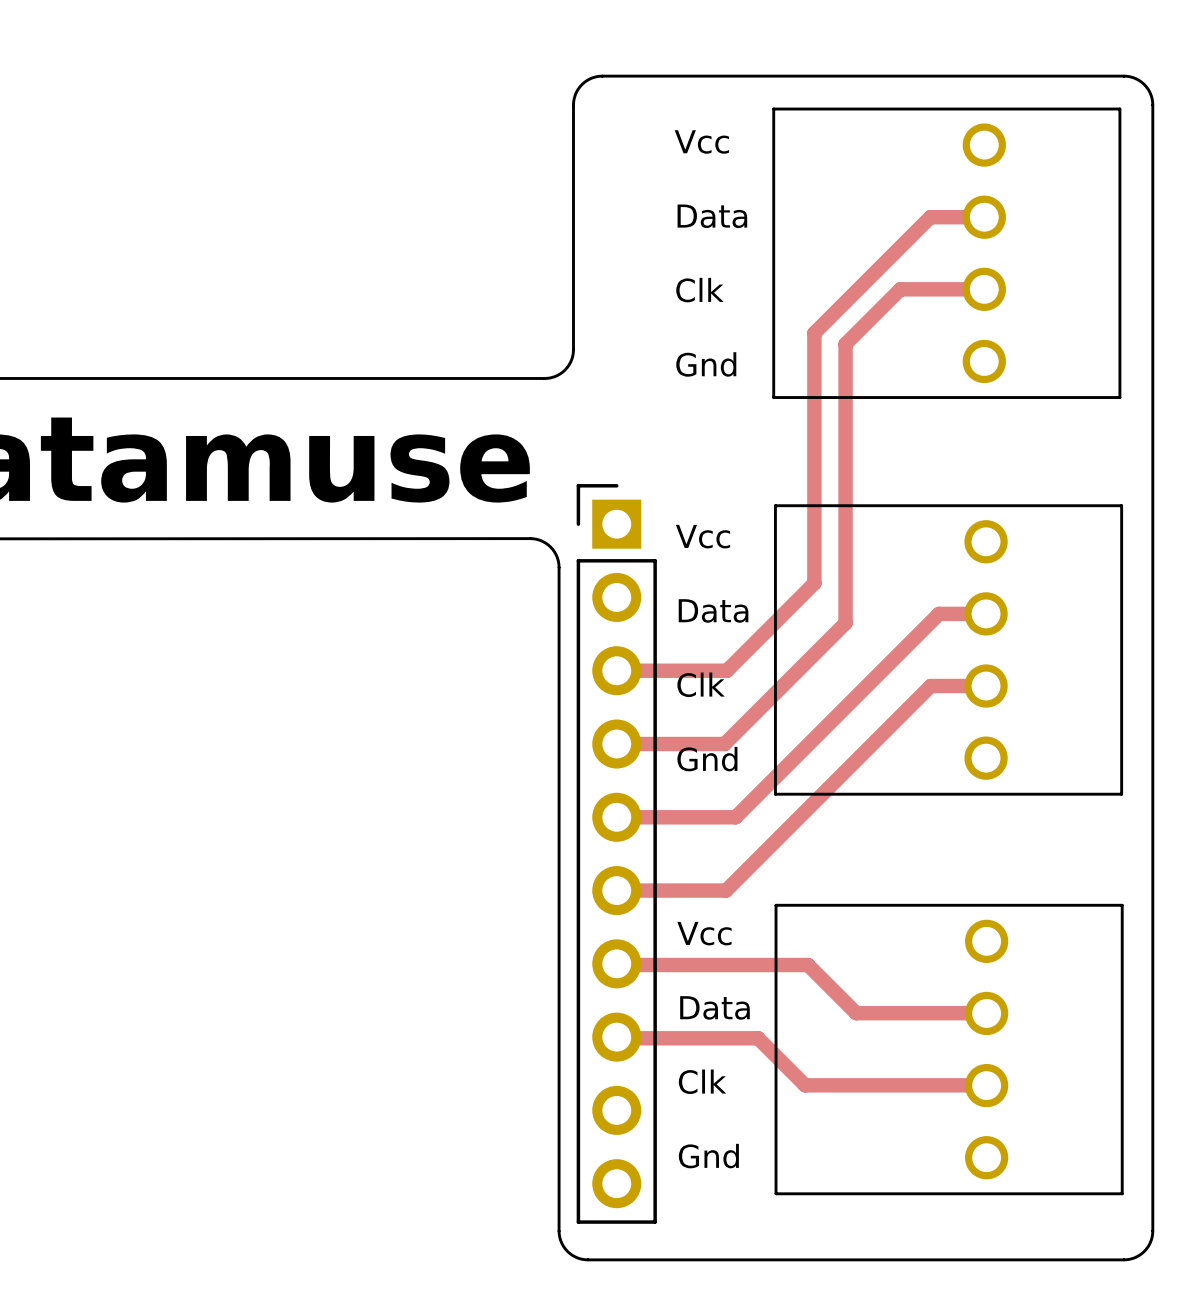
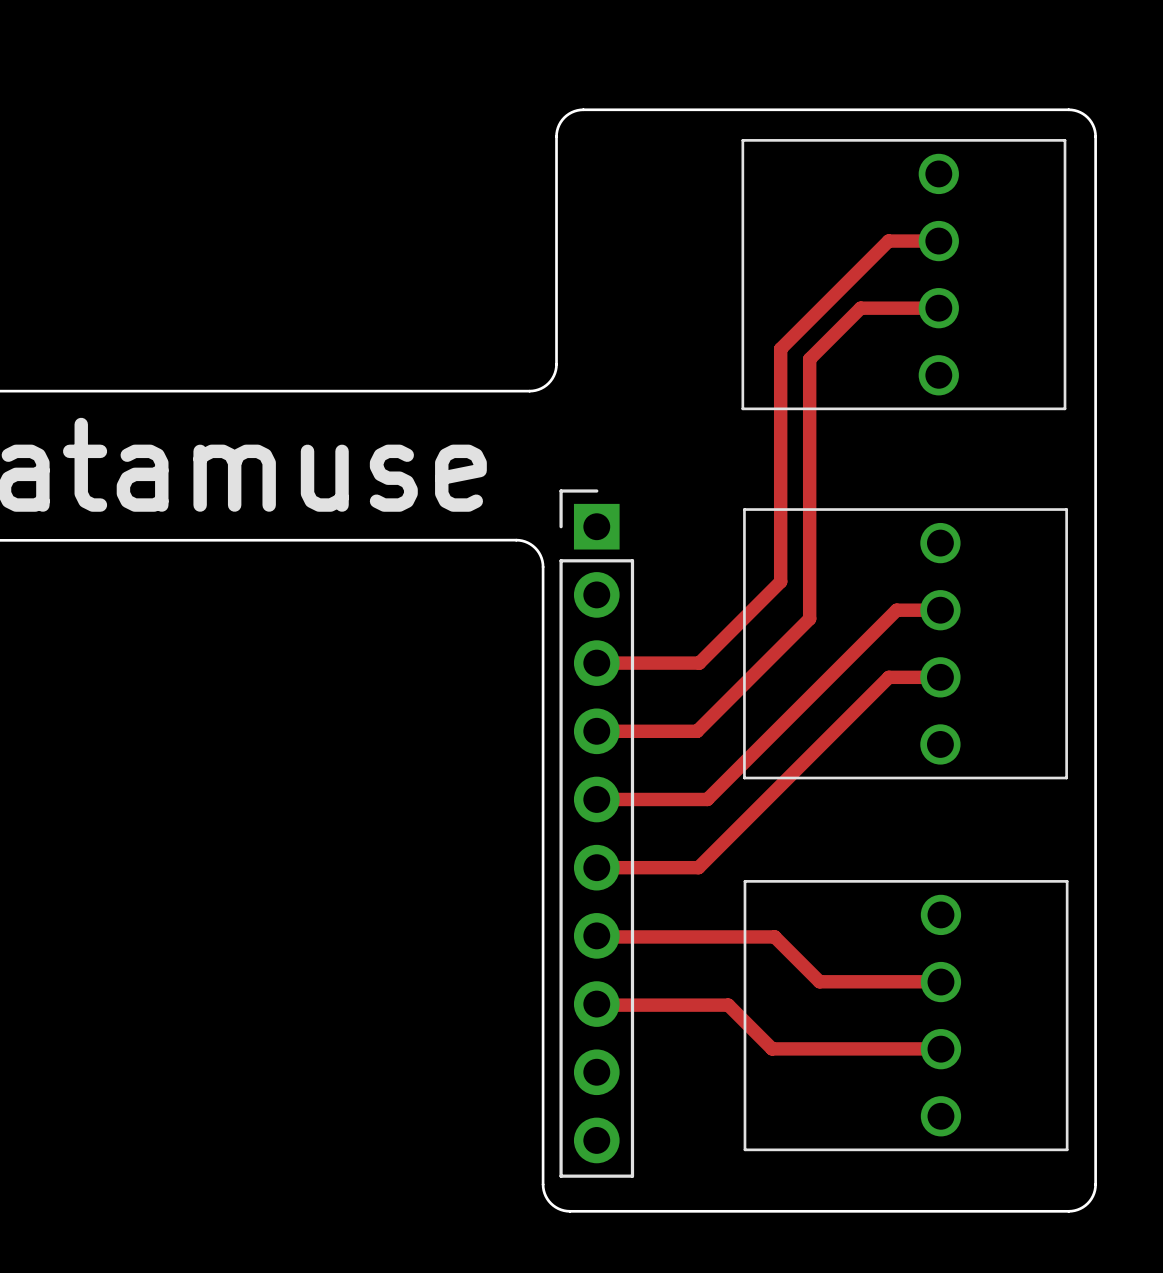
text: Vcc (701, 141) -> none
text: Data (712, 216) -> none
text: Clk (699, 290) -> none
text: Gnd (706, 364) -> none
text: Vcc (703, 536) -> none
text: Data (713, 610) -> none
text: Clk (701, 684) -> none
text: Gnd (707, 759) -> none
text: Vcc (704, 933) -> none
text: Data (714, 1007) -> none
text: Clk (702, 1081) -> none
text: Gnd (708, 1156) -> none

